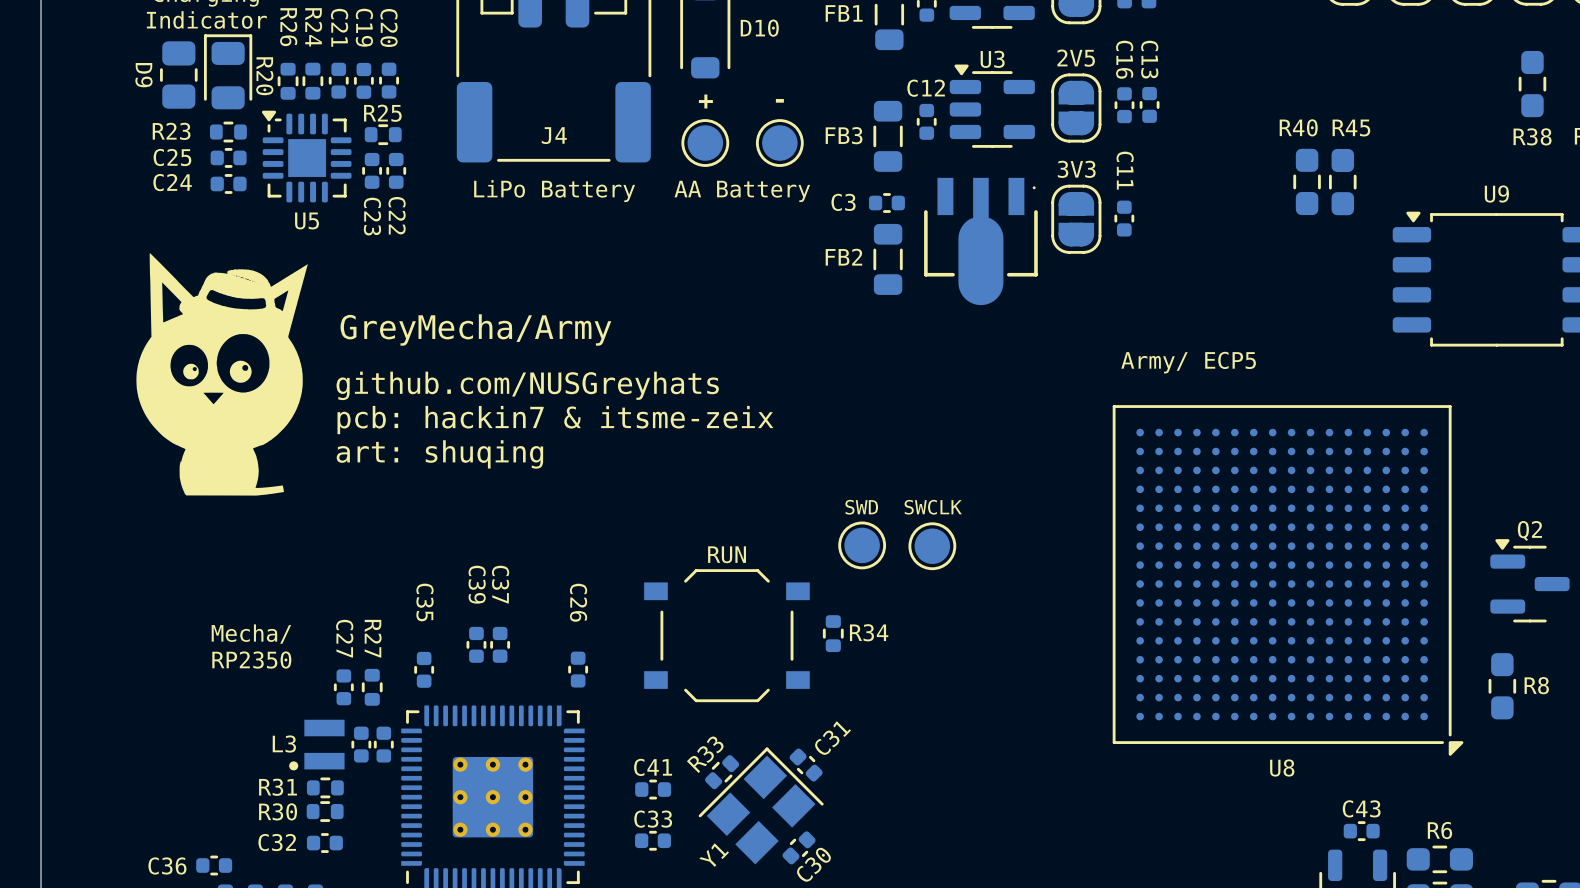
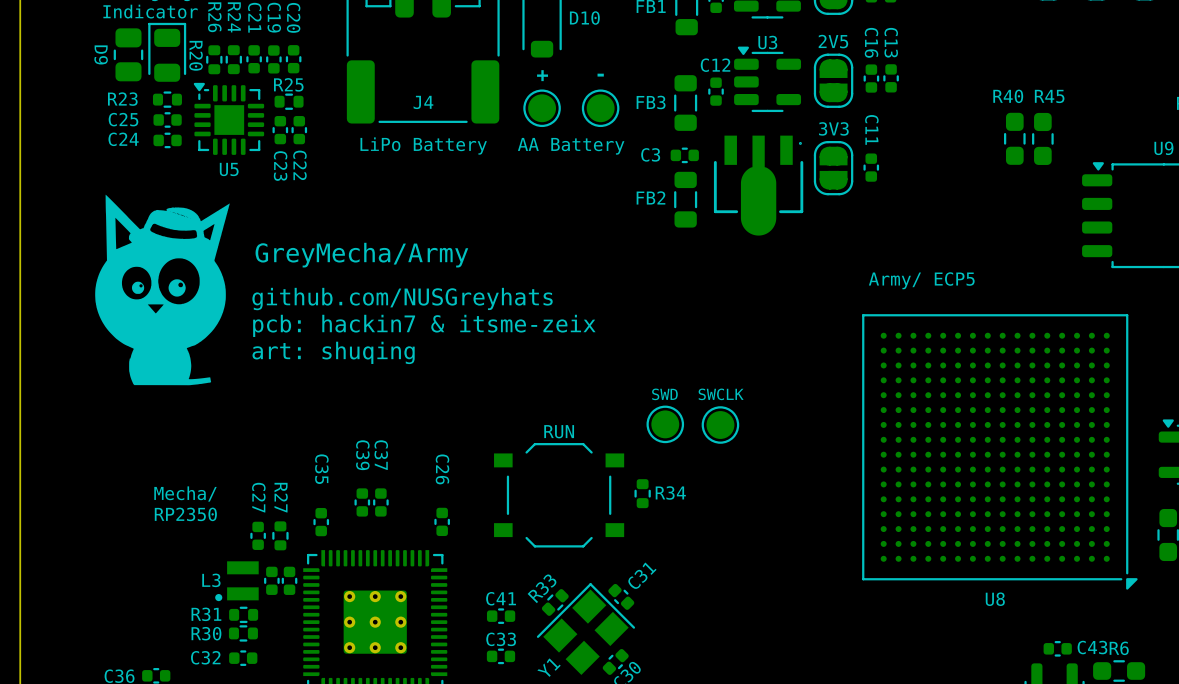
C43 name position: C43 (1361, 808) -> C43 (1092, 647)

